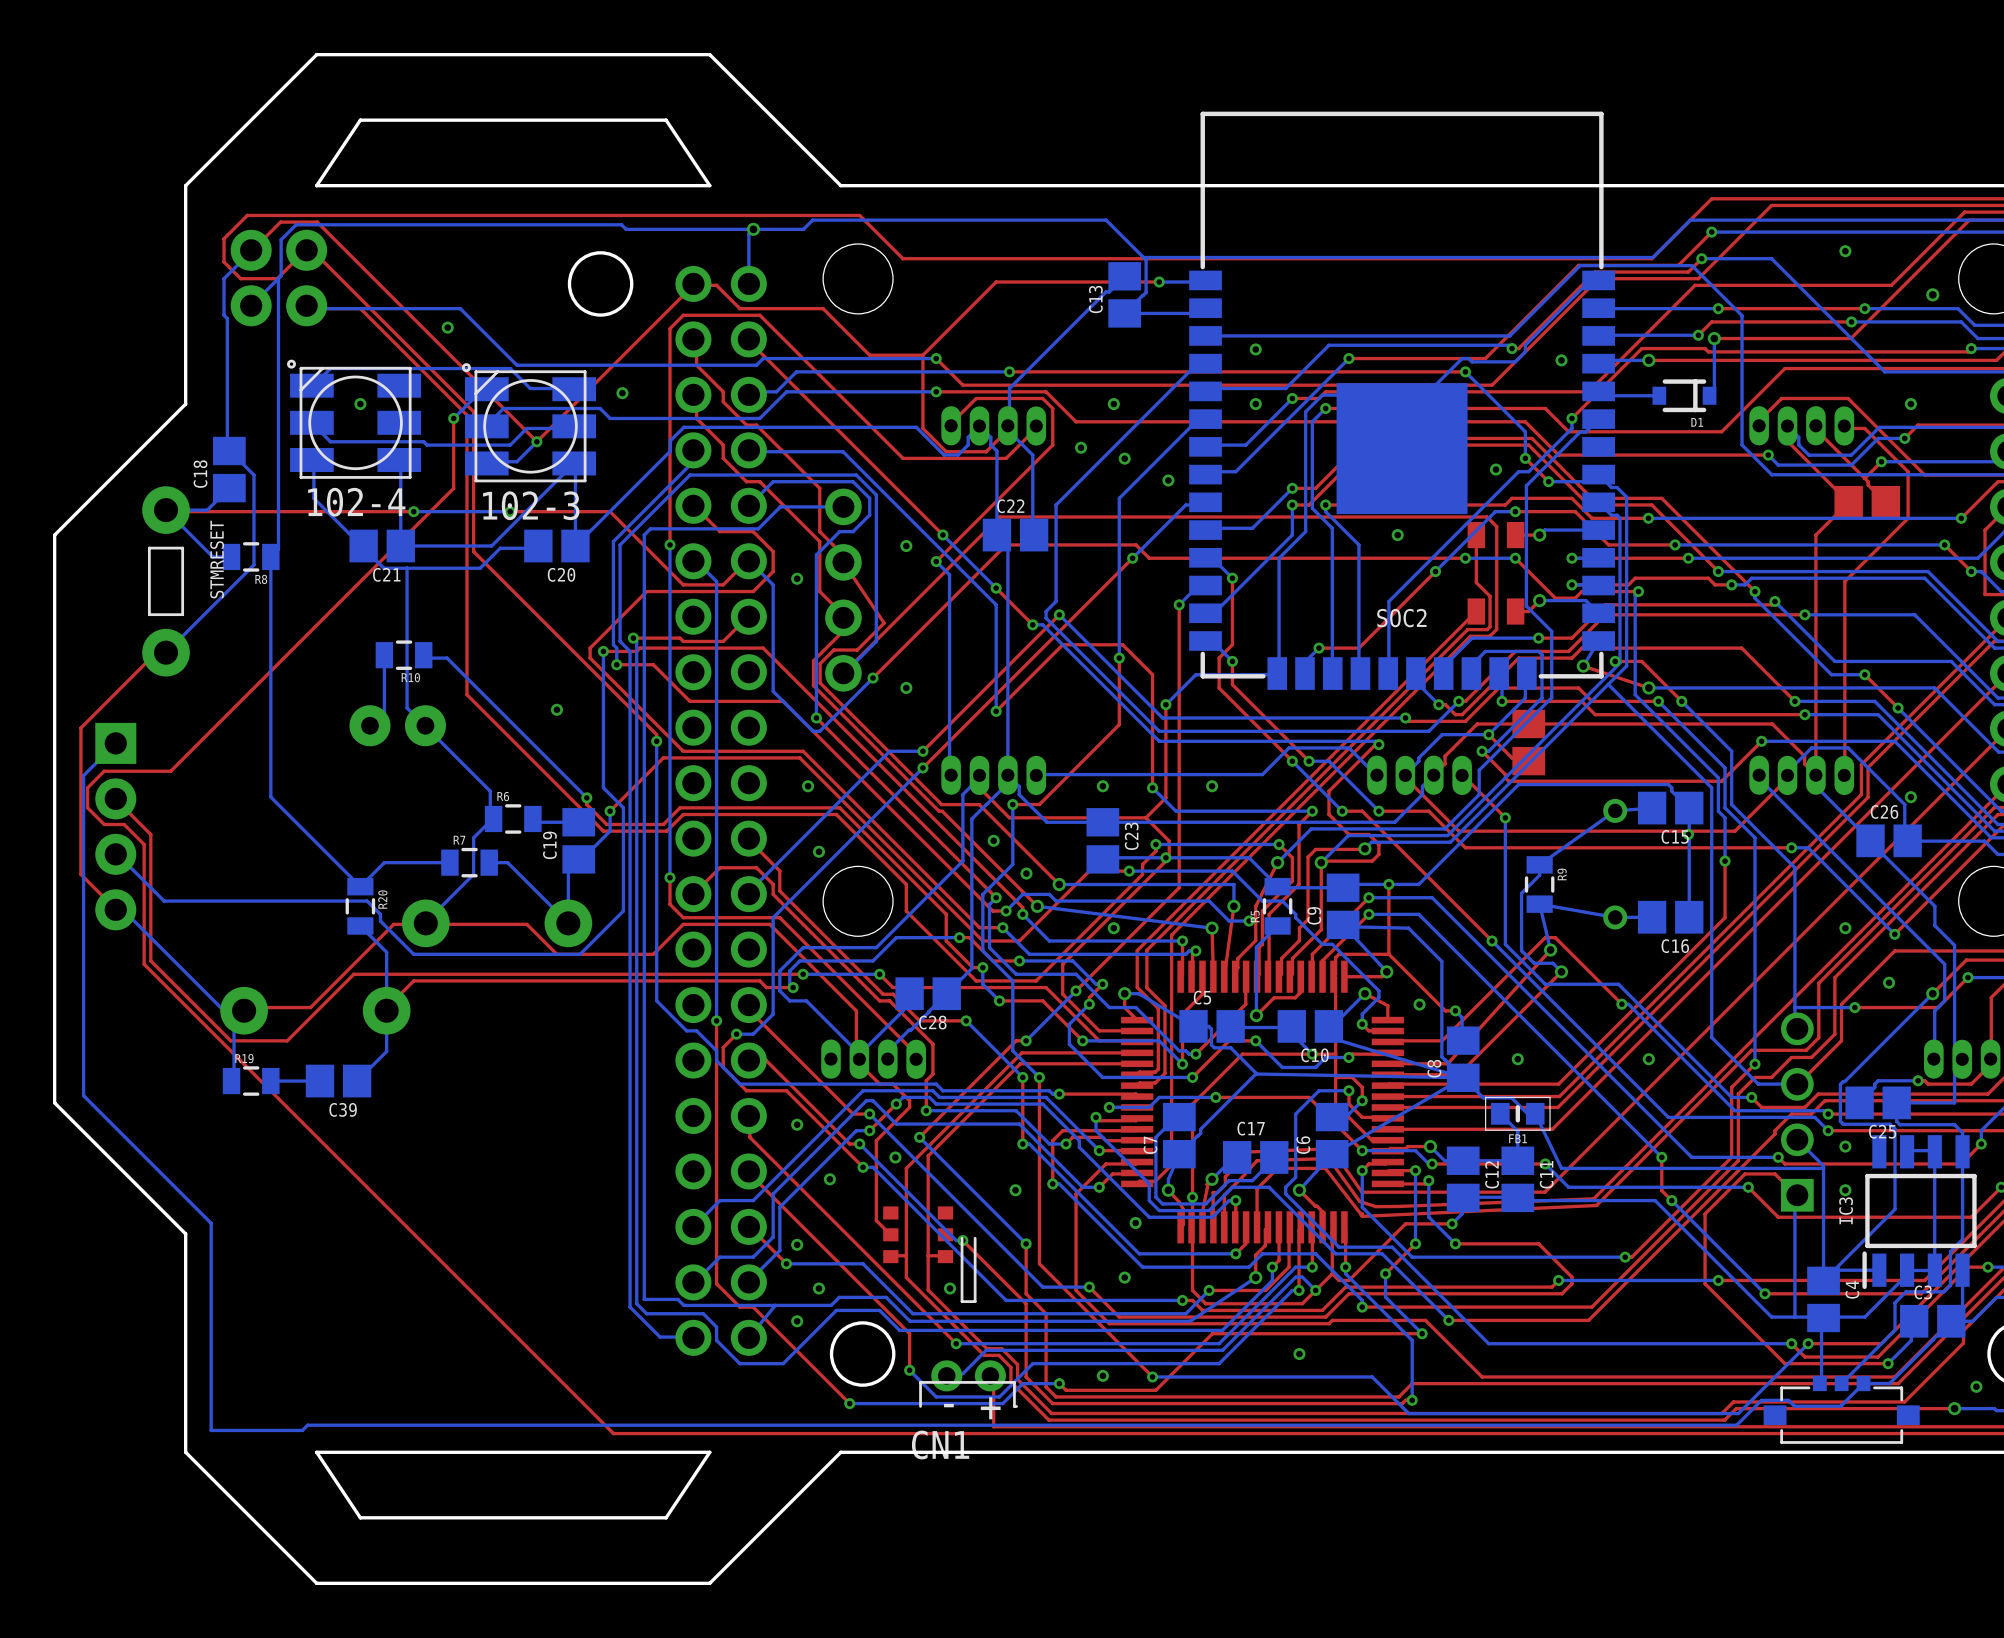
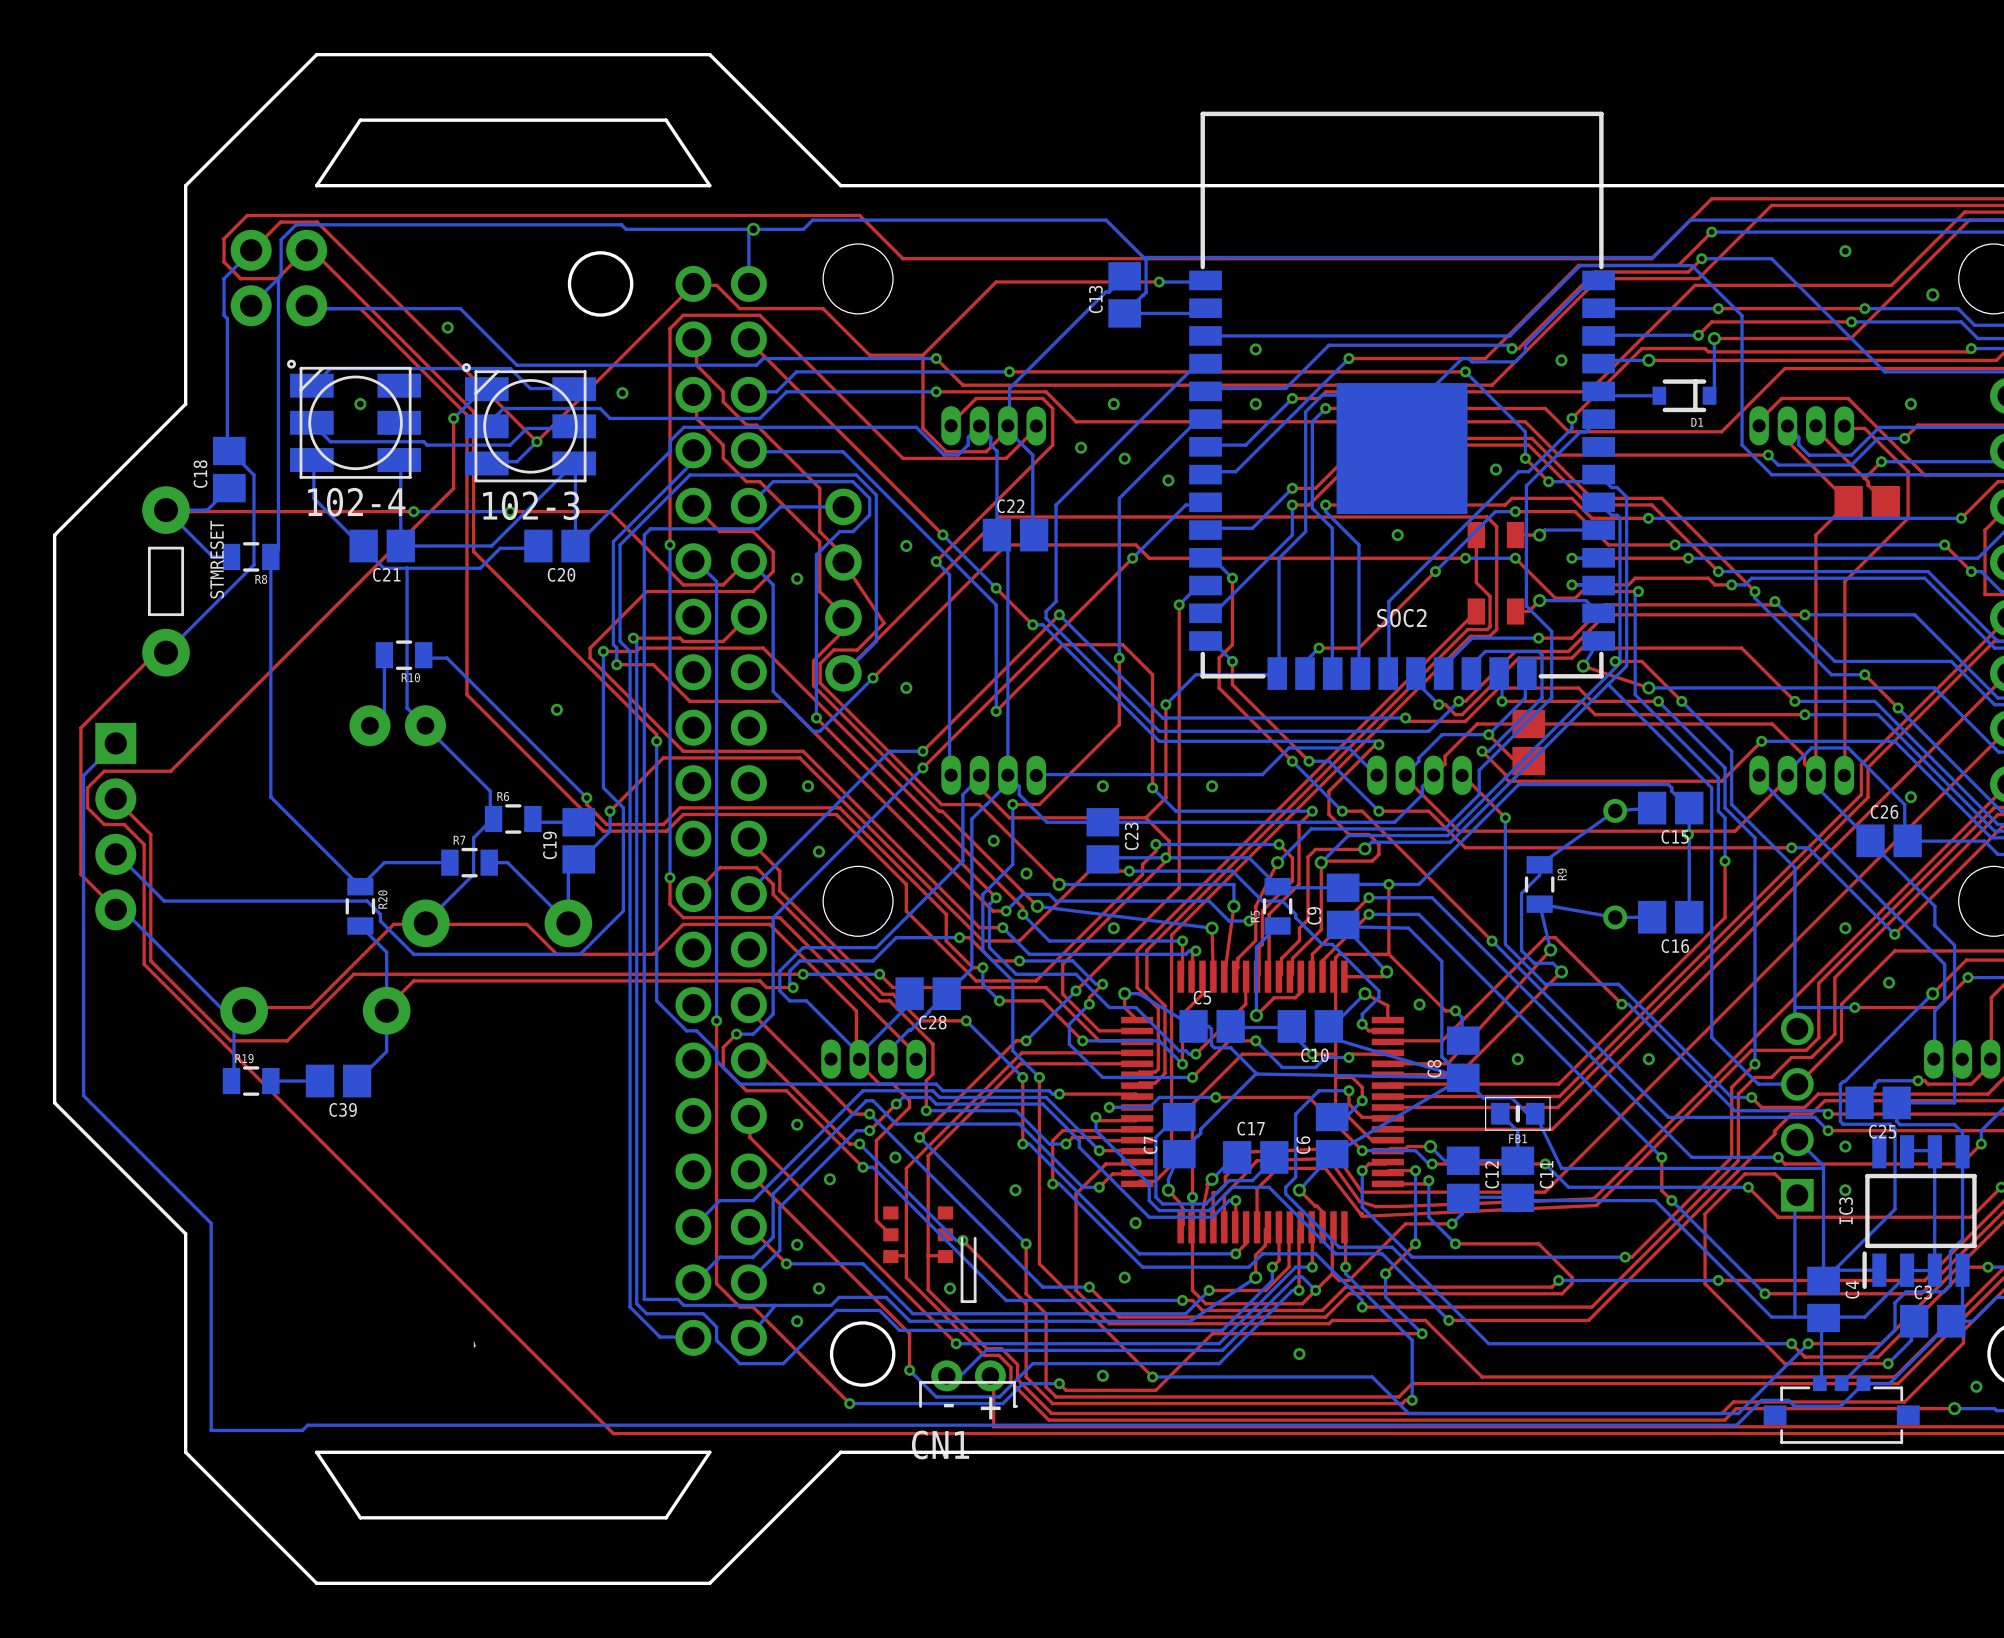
drawing: none -> [473, 1340, 476, 1348]

